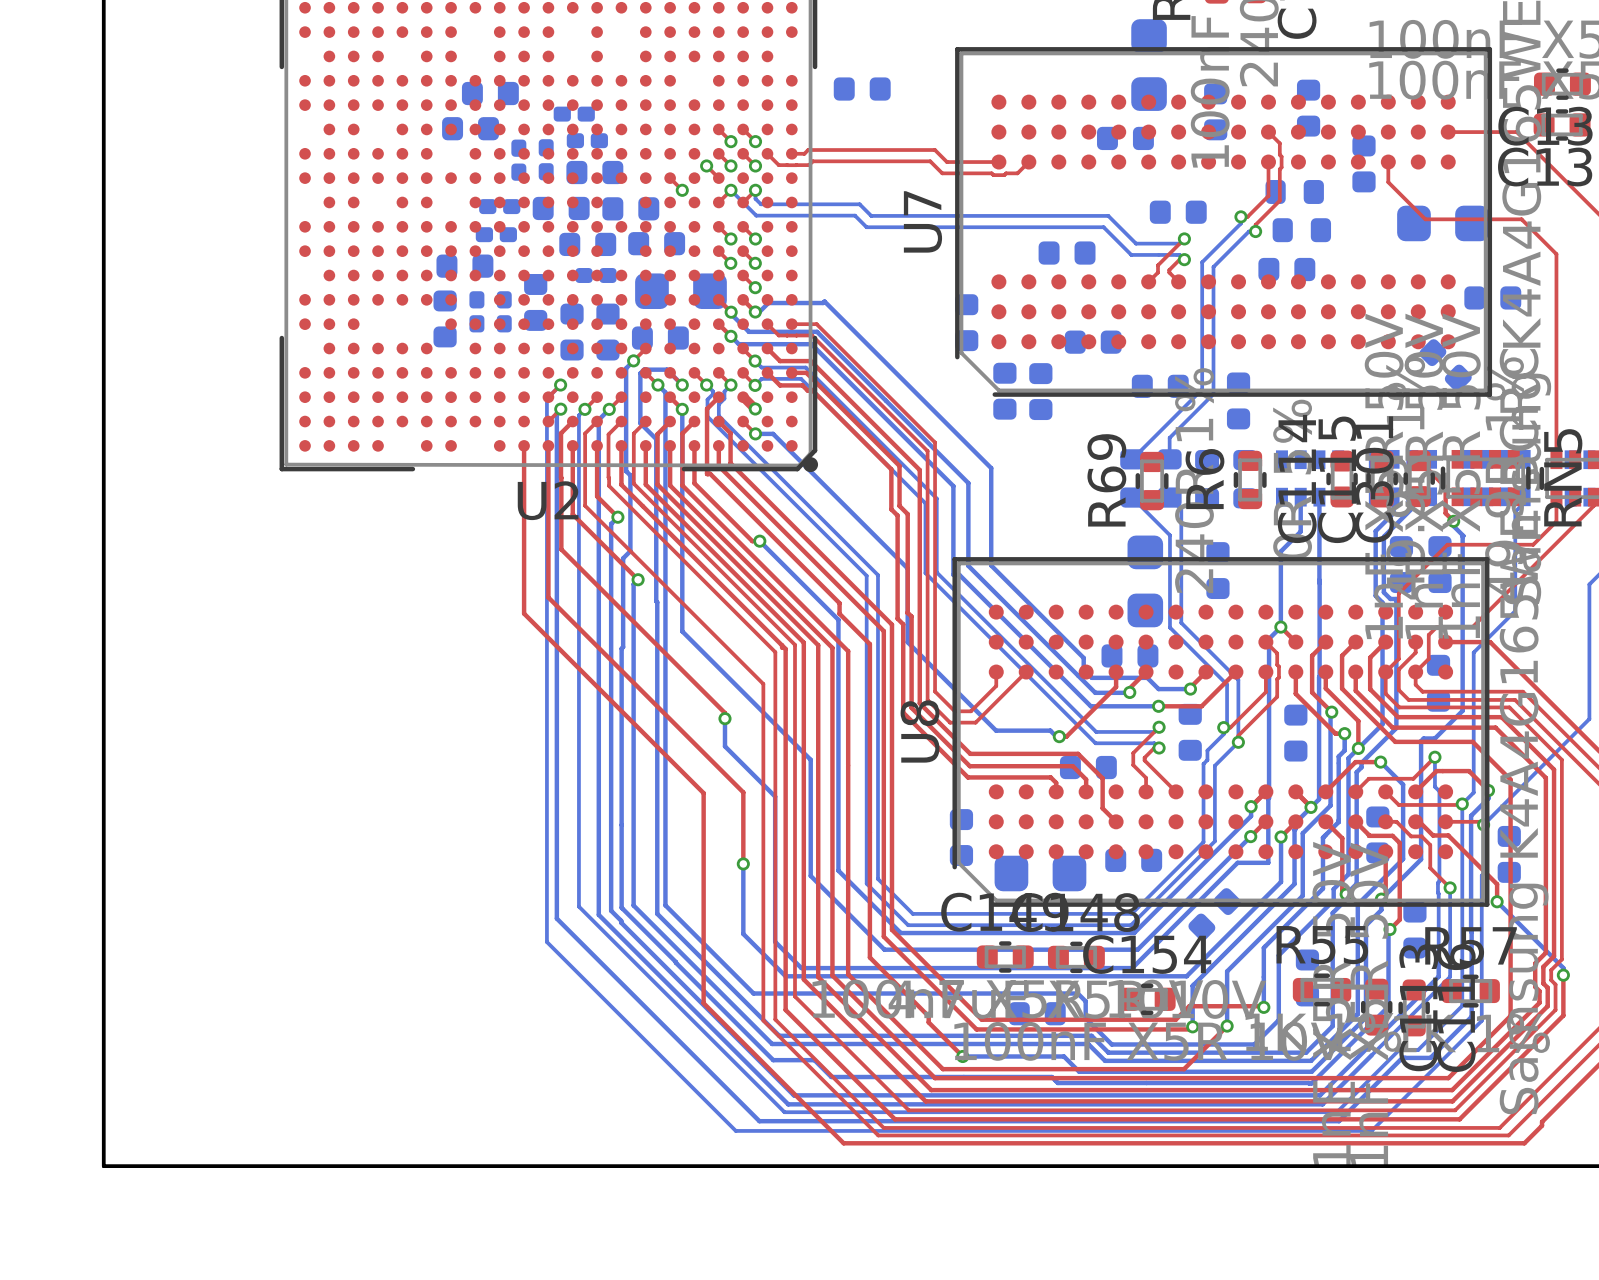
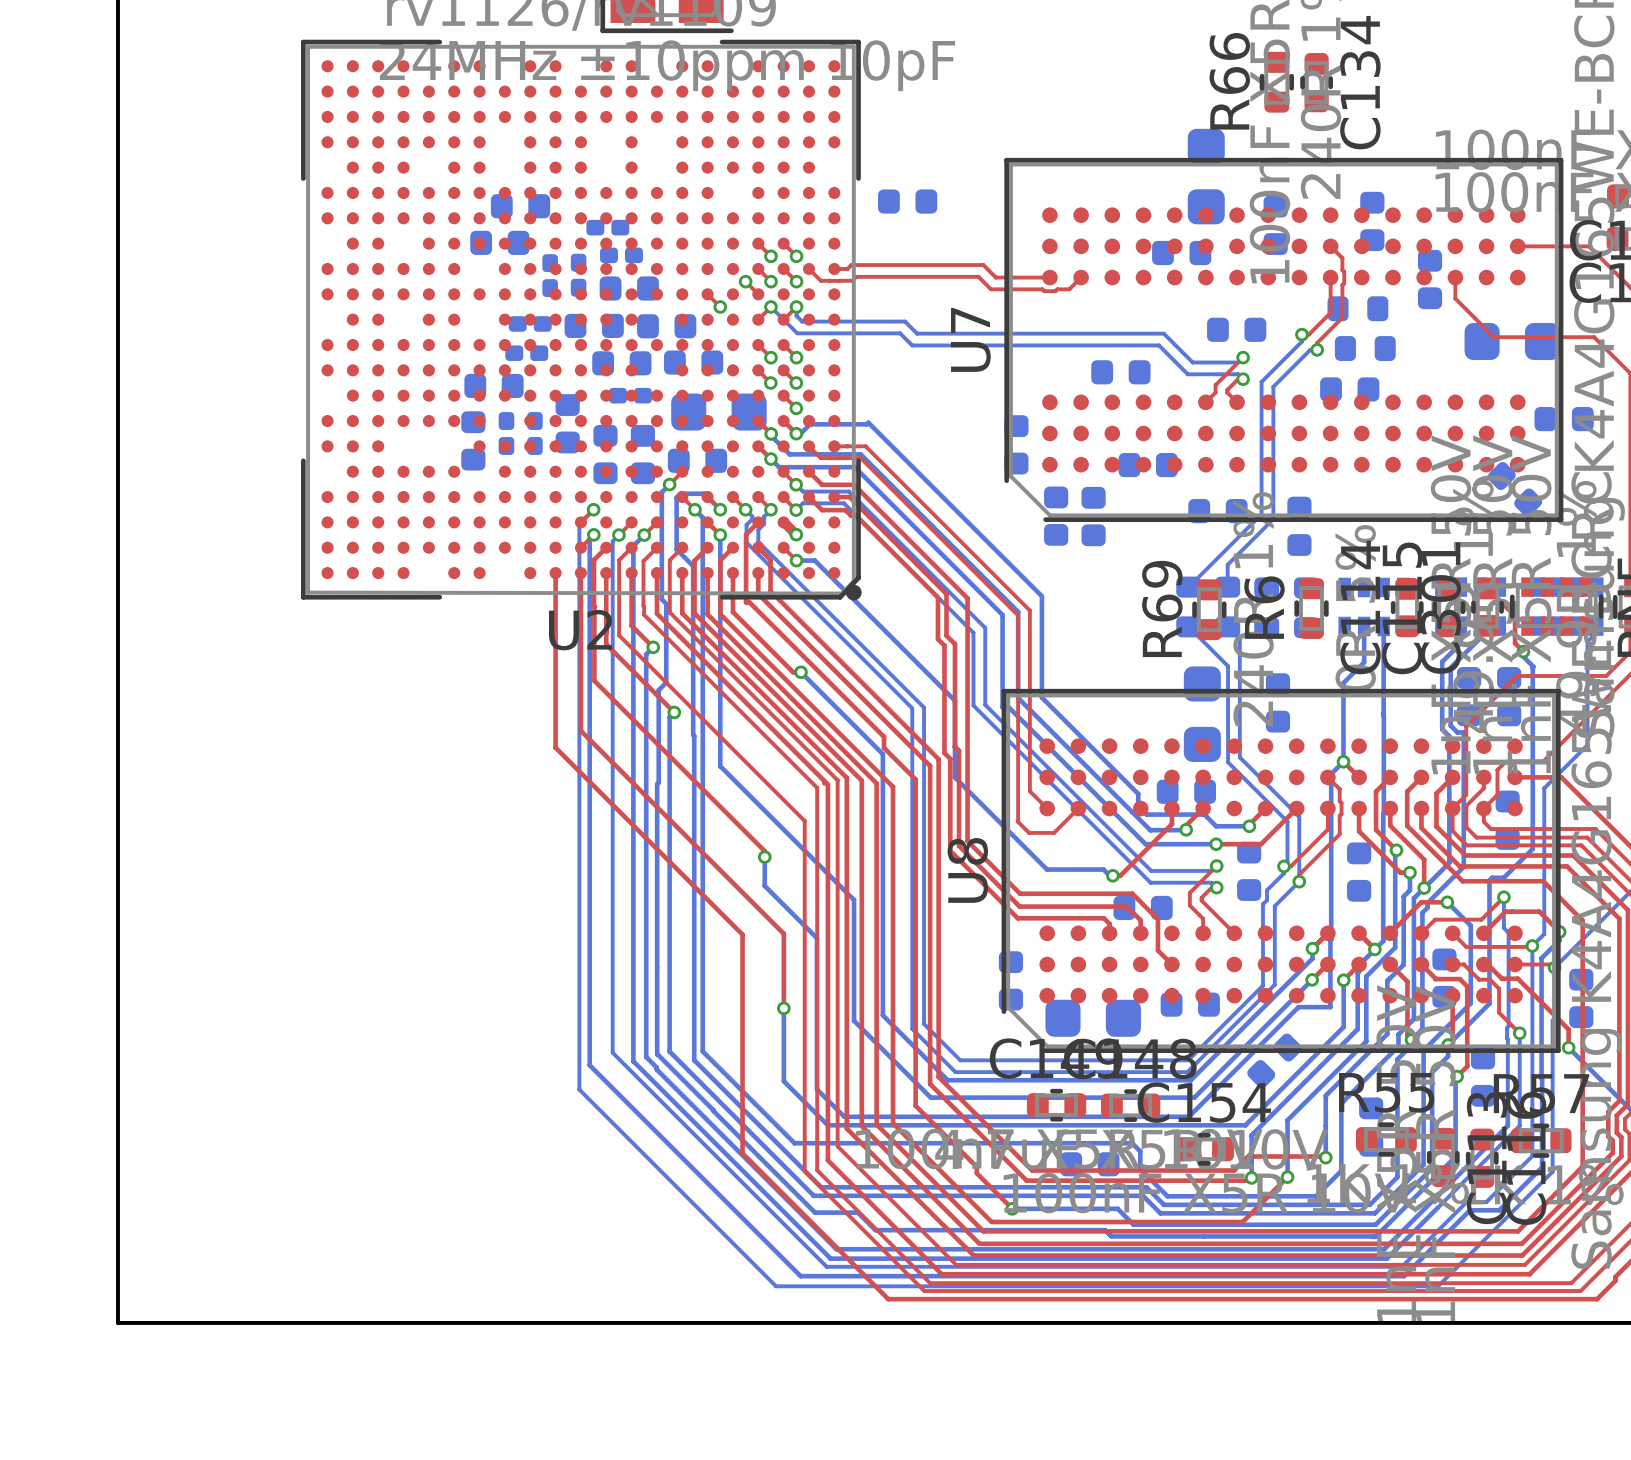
top track: (804, 324) (816, 324) (935, 442) (935, 691) (954, 711) (970, 711) (996, 685) (996, 672) -> (847, 446) (865, 446) (1029, 610) (1029, 791) (1047, 808)
top track: (811, 335) (927, 451) (927, 700) (950, 722) (975, 722) (1002, 695) -> (855, 458) (860, 458) (1018, 615) (1018, 821) (1029, 832) (1054, 832)

